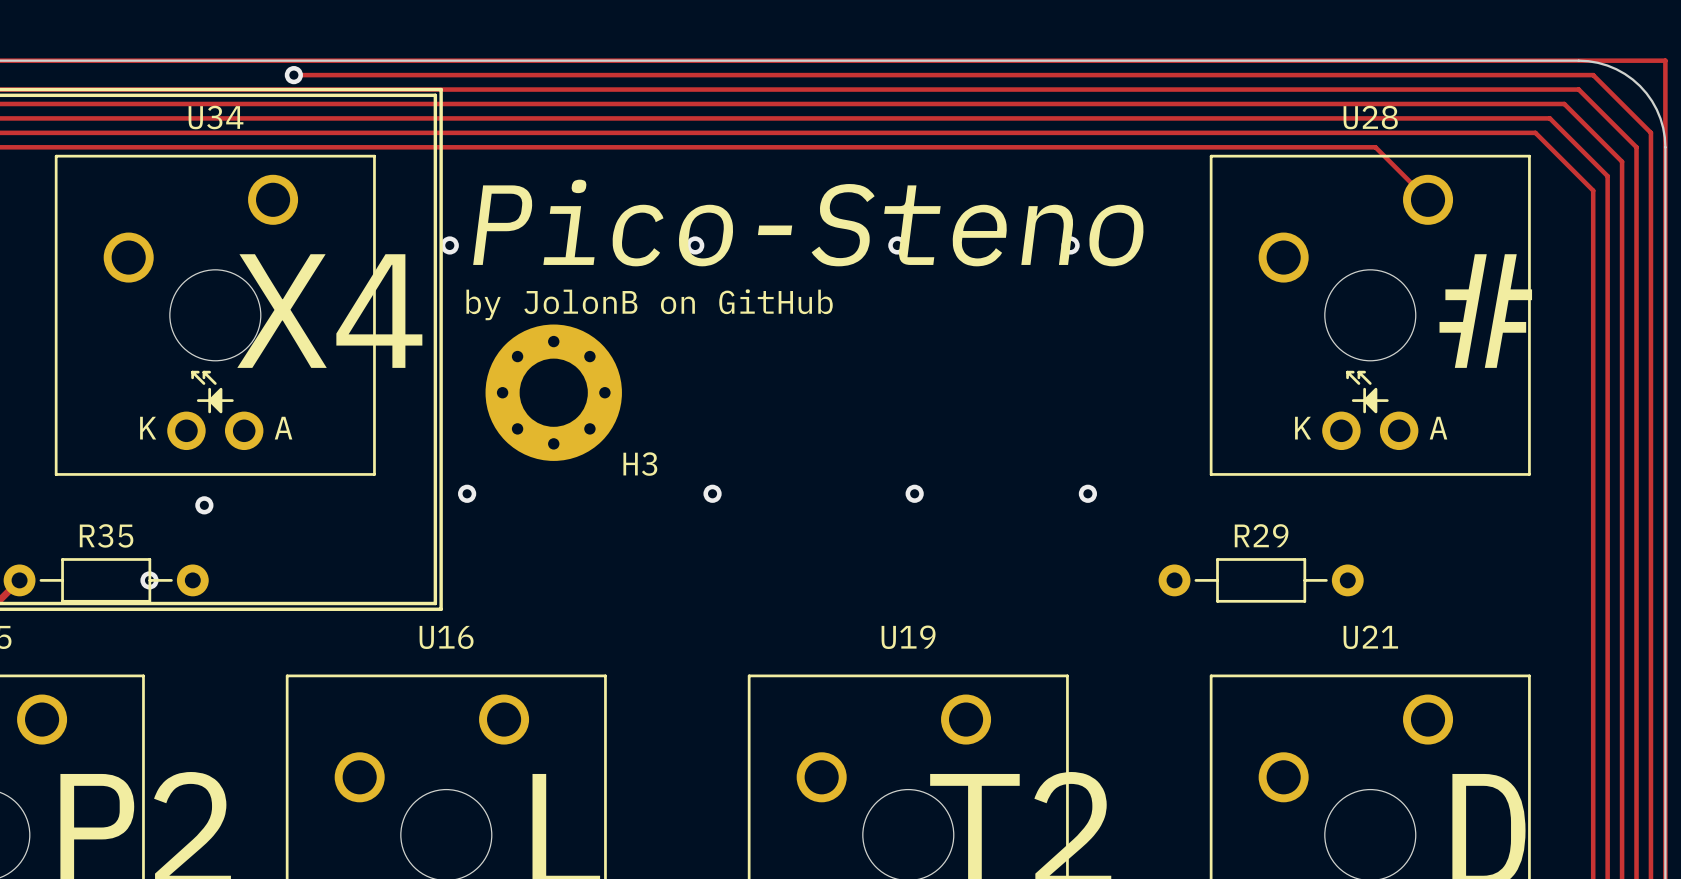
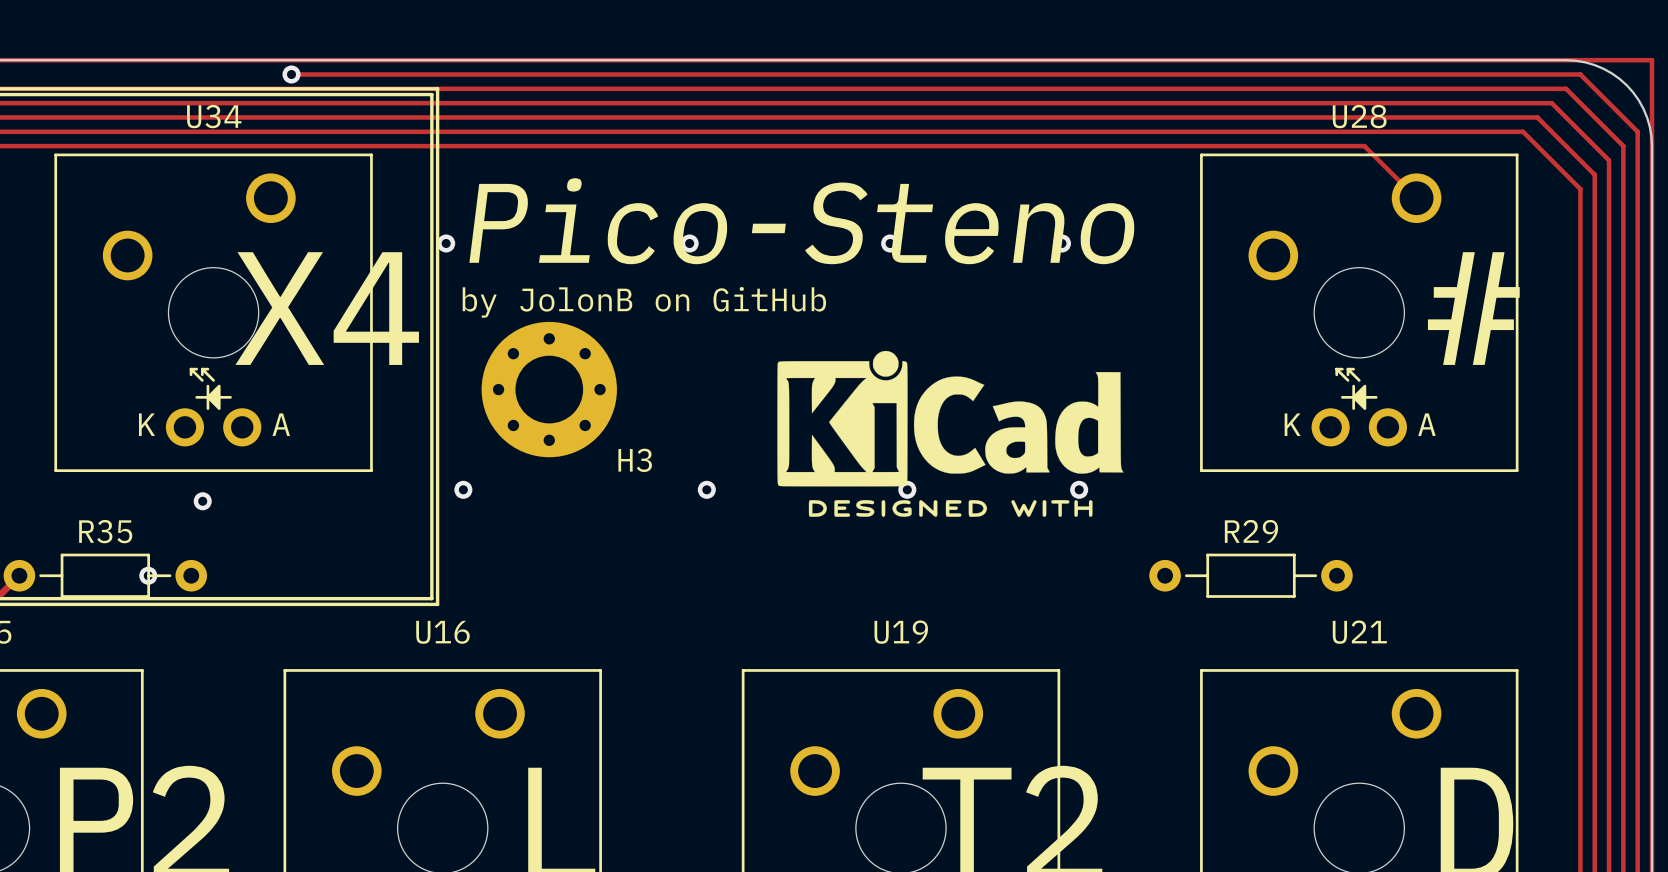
drawing: none -> [777, 350, 1124, 517]

